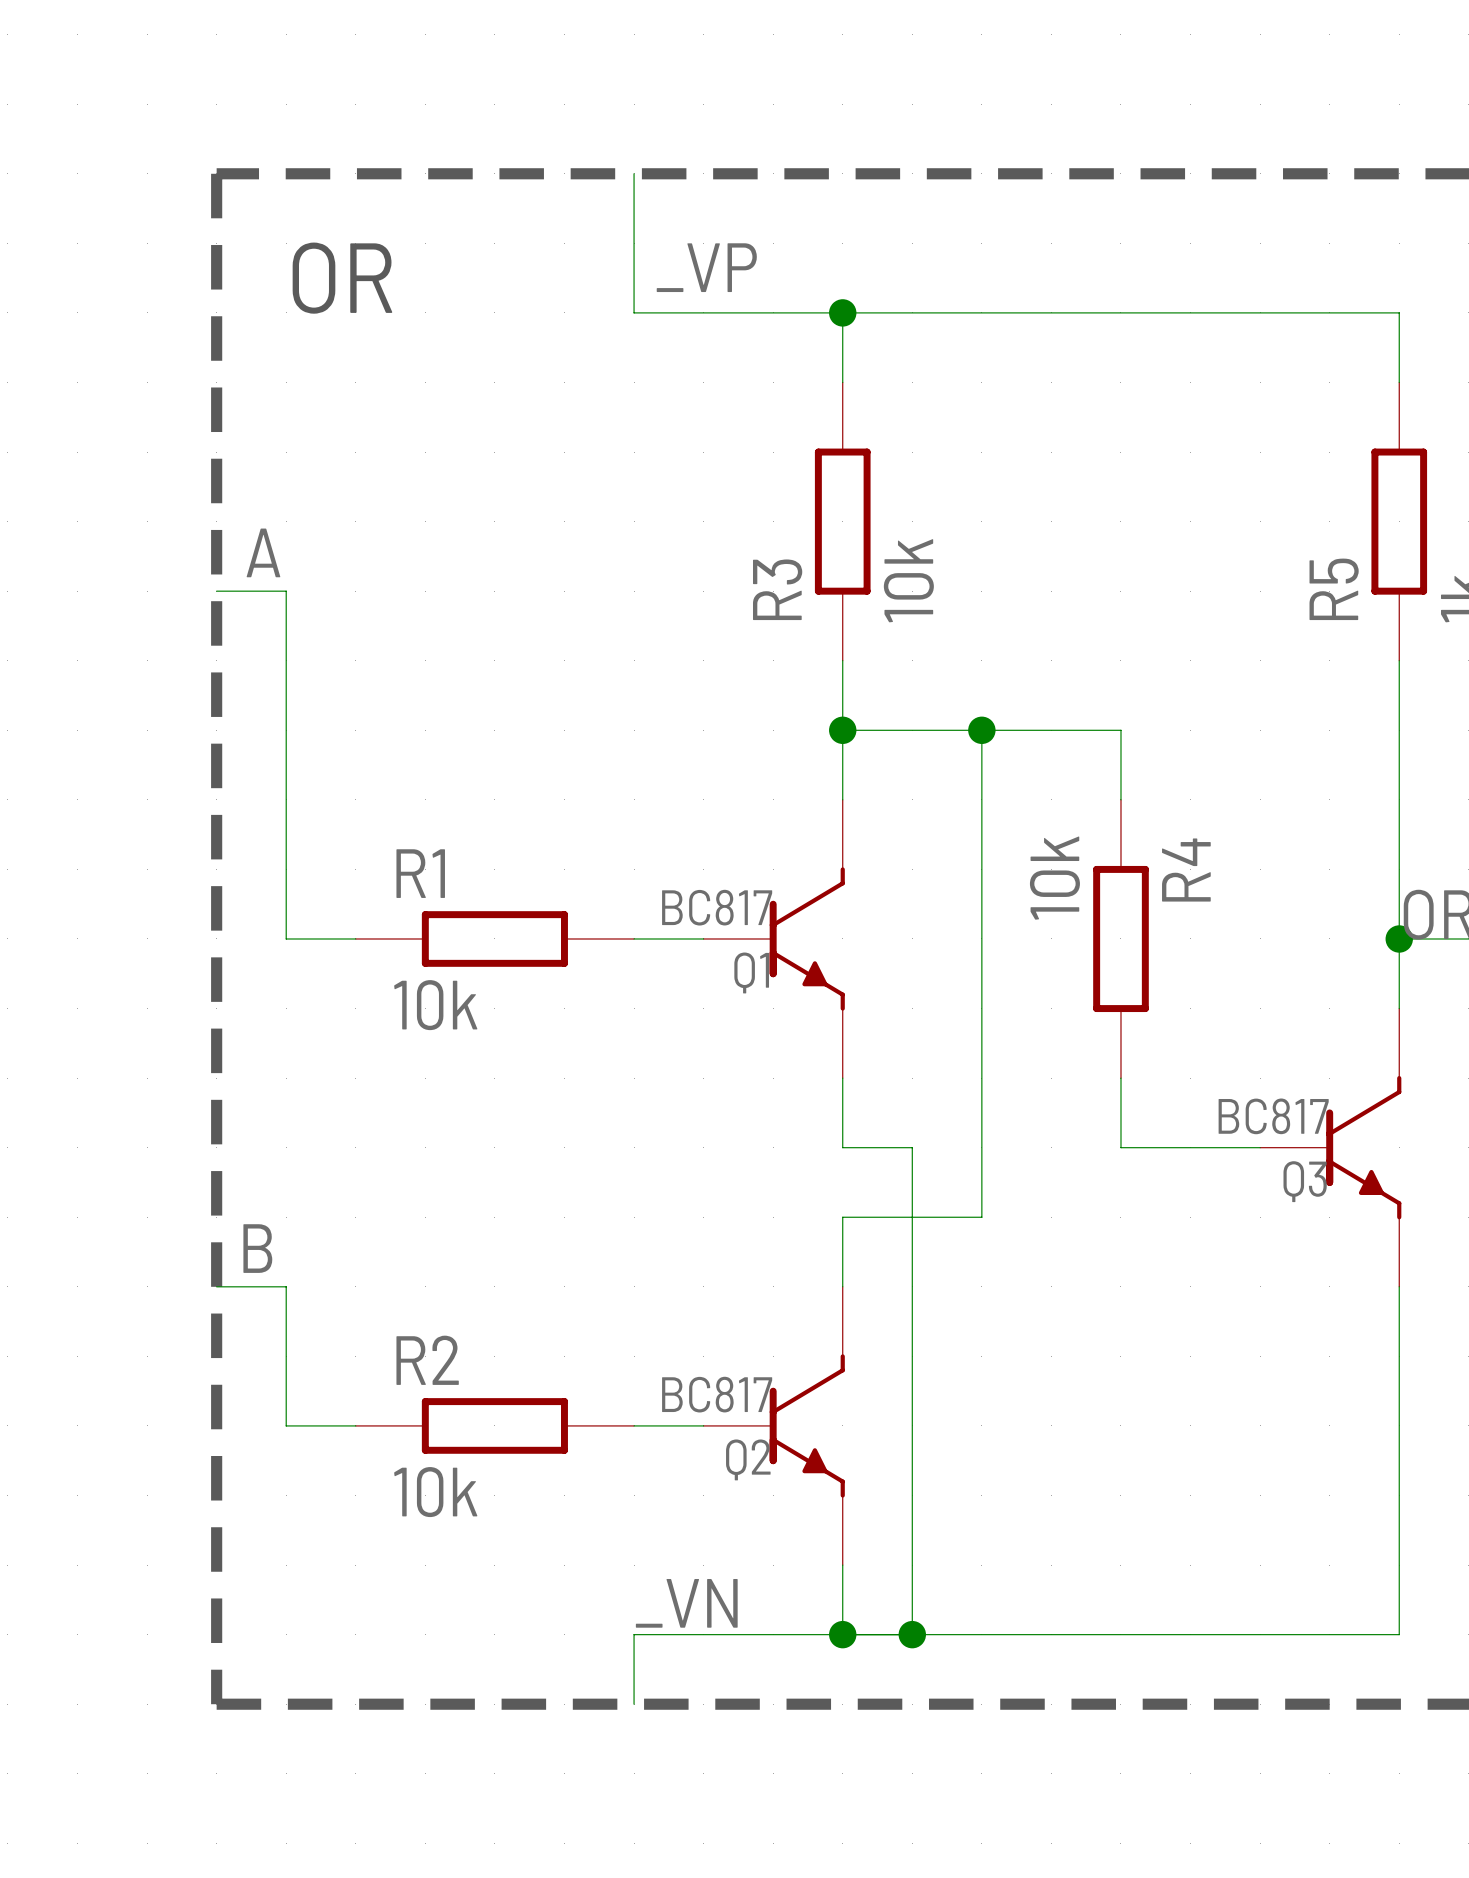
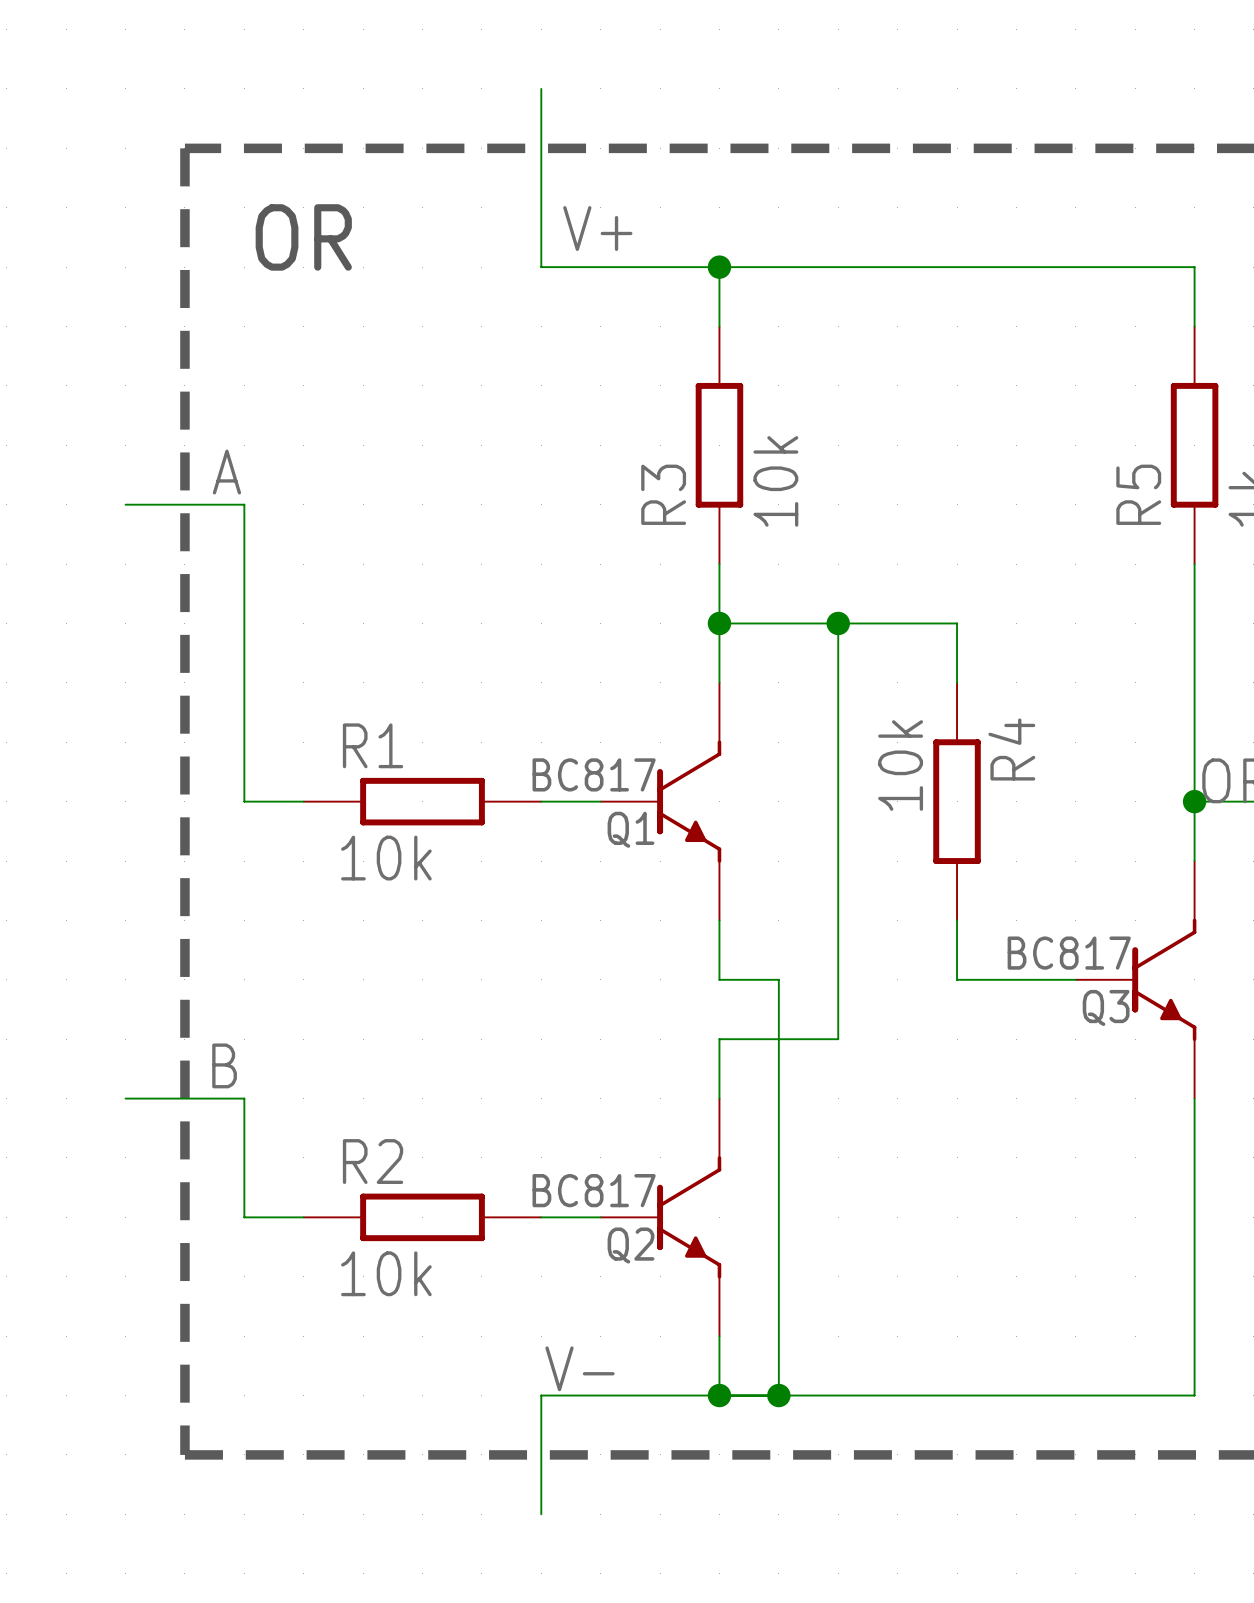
wire: none -> (541, 88) (541, 148)
label: _VP (706, 267) -> V+ (597, 228)
wire: none -> (125, 504) (184, 504)
wire: none -> (125, 1098) (184, 1098)
label: _VN (686, 1603) -> V- (580, 1368)
wire: none -> (541, 1454) (541, 1514)

